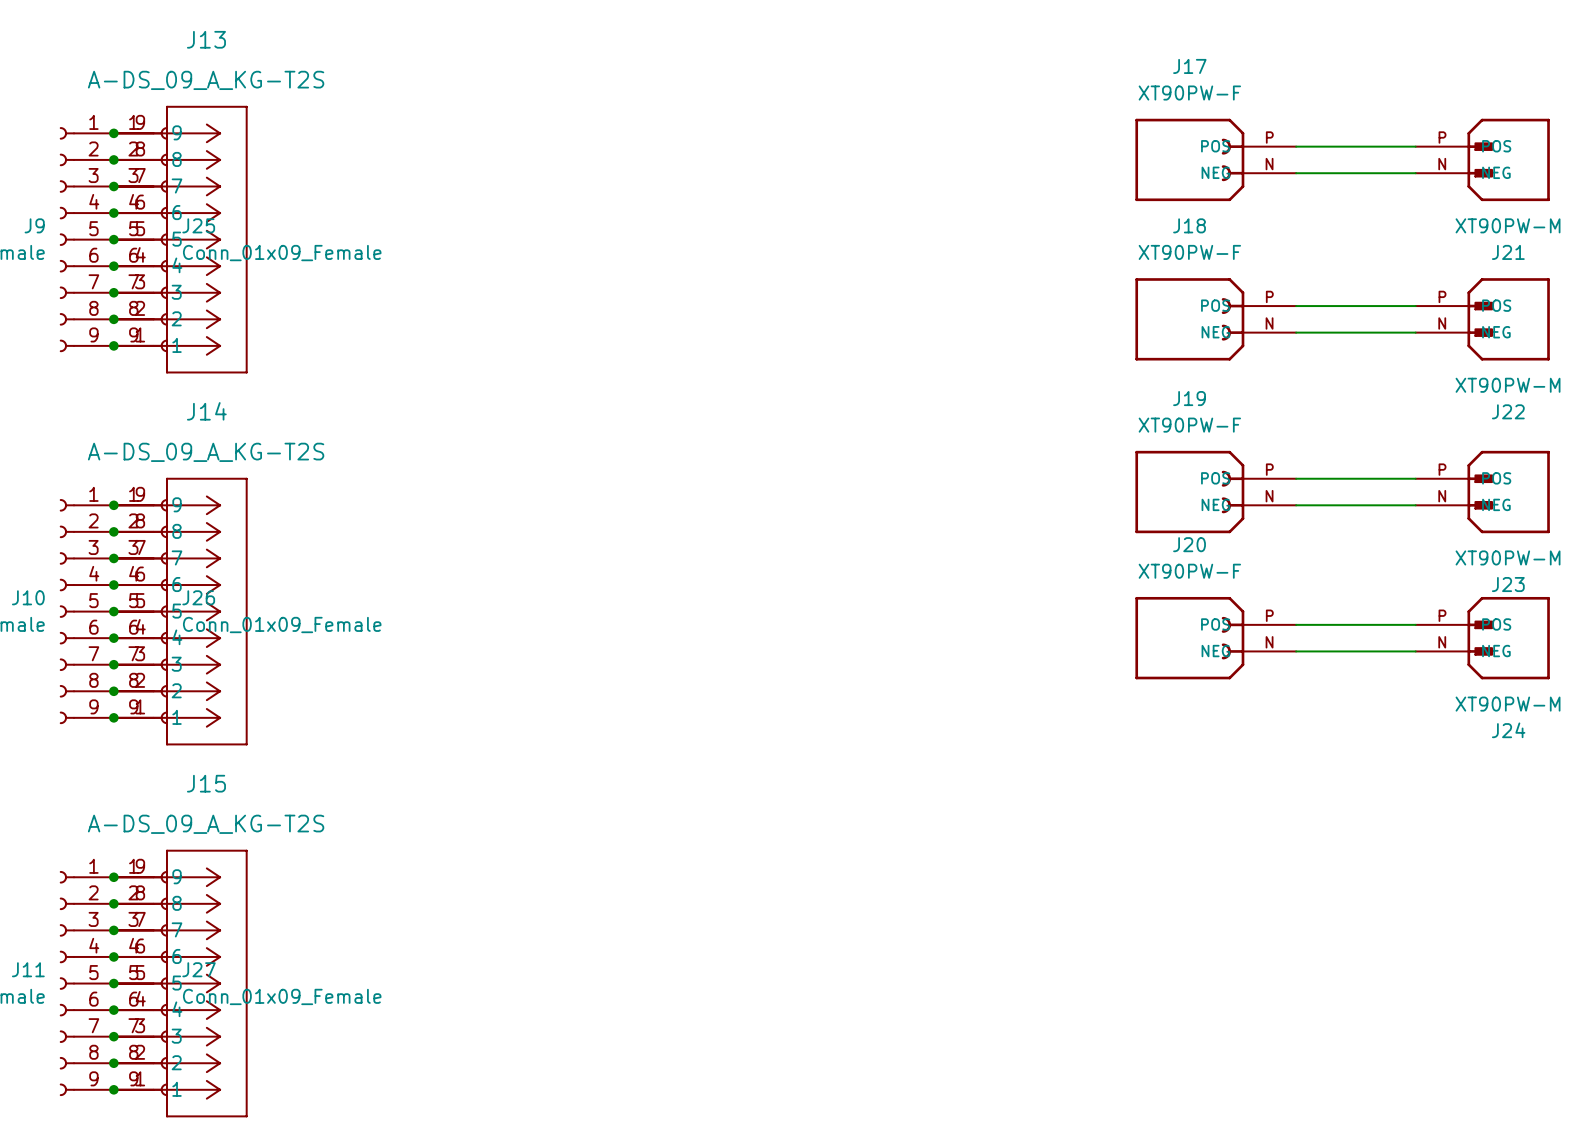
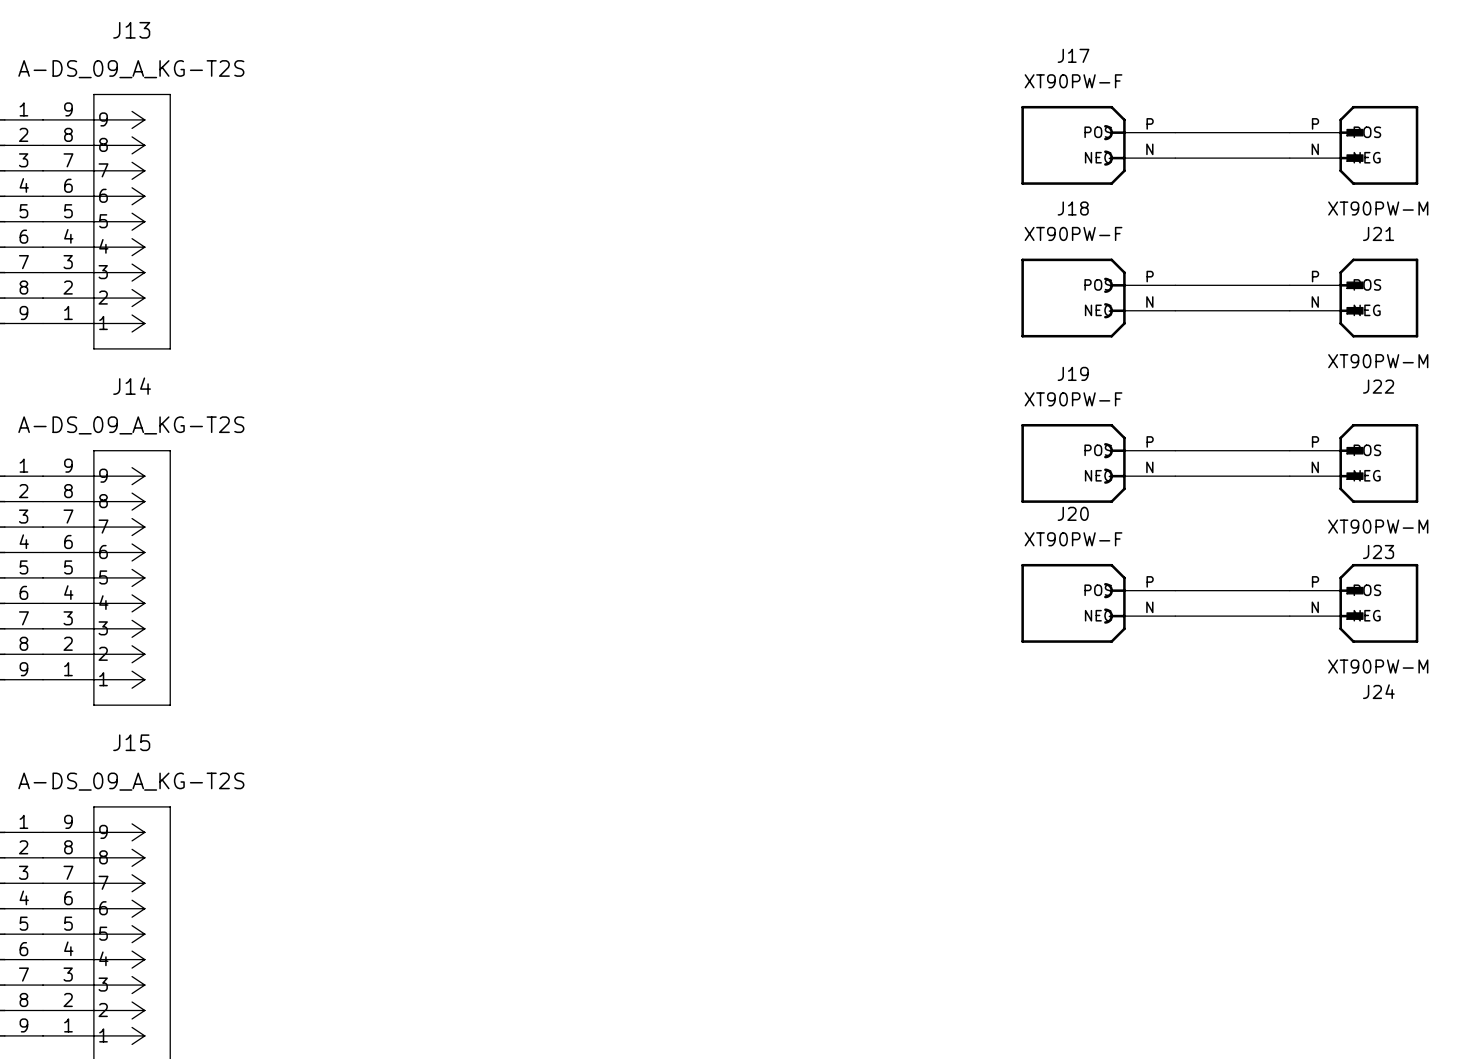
junction: (113, 133) -> none
junction: (113, 159) -> none
junction: (113, 186) -> none
junction: (113, 213) -> none
junction: (113, 239) -> none
J25: Conn_01x09_Female (140, 239) -> none
junction: (113, 266) -> none
junction: (113, 292) -> none
junction: (113, 319) -> none
junction: (113, 345) -> none
junction: (113, 505) -> none
junction: (113, 531) -> none
junction: (113, 558) -> none
junction: (113, 585) -> none
junction: (113, 611) -> none
J26: Conn_01x09_Female (140, 611) -> none
junction: (113, 638) -> none
junction: (113, 664) -> none
junction: (113, 691) -> none
junction: (113, 717) -> none
junction: (113, 877) -> none
junction: (113, 903) -> none
junction: (113, 930) -> none
junction: (113, 956) -> none
junction: (113, 983) -> none
J27: Conn_01x09_Female (140, 983) -> none
junction: (113, 1010) -> none
junction: (113, 1036) -> none
junction: (113, 1063) -> none
junction: (113, 1089) -> none

